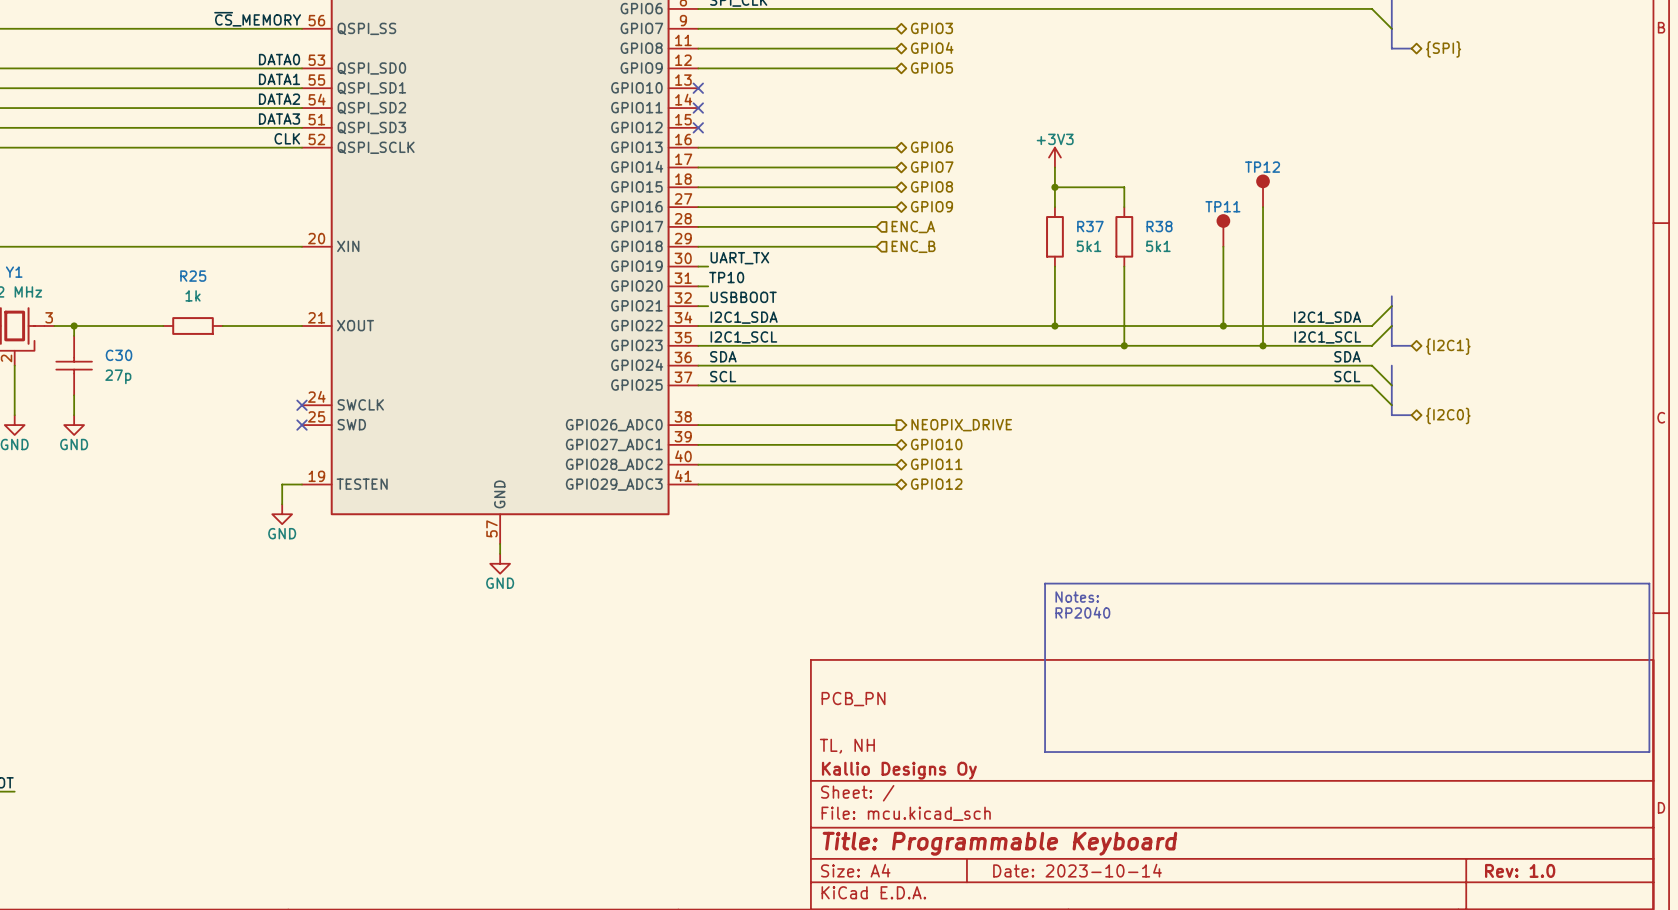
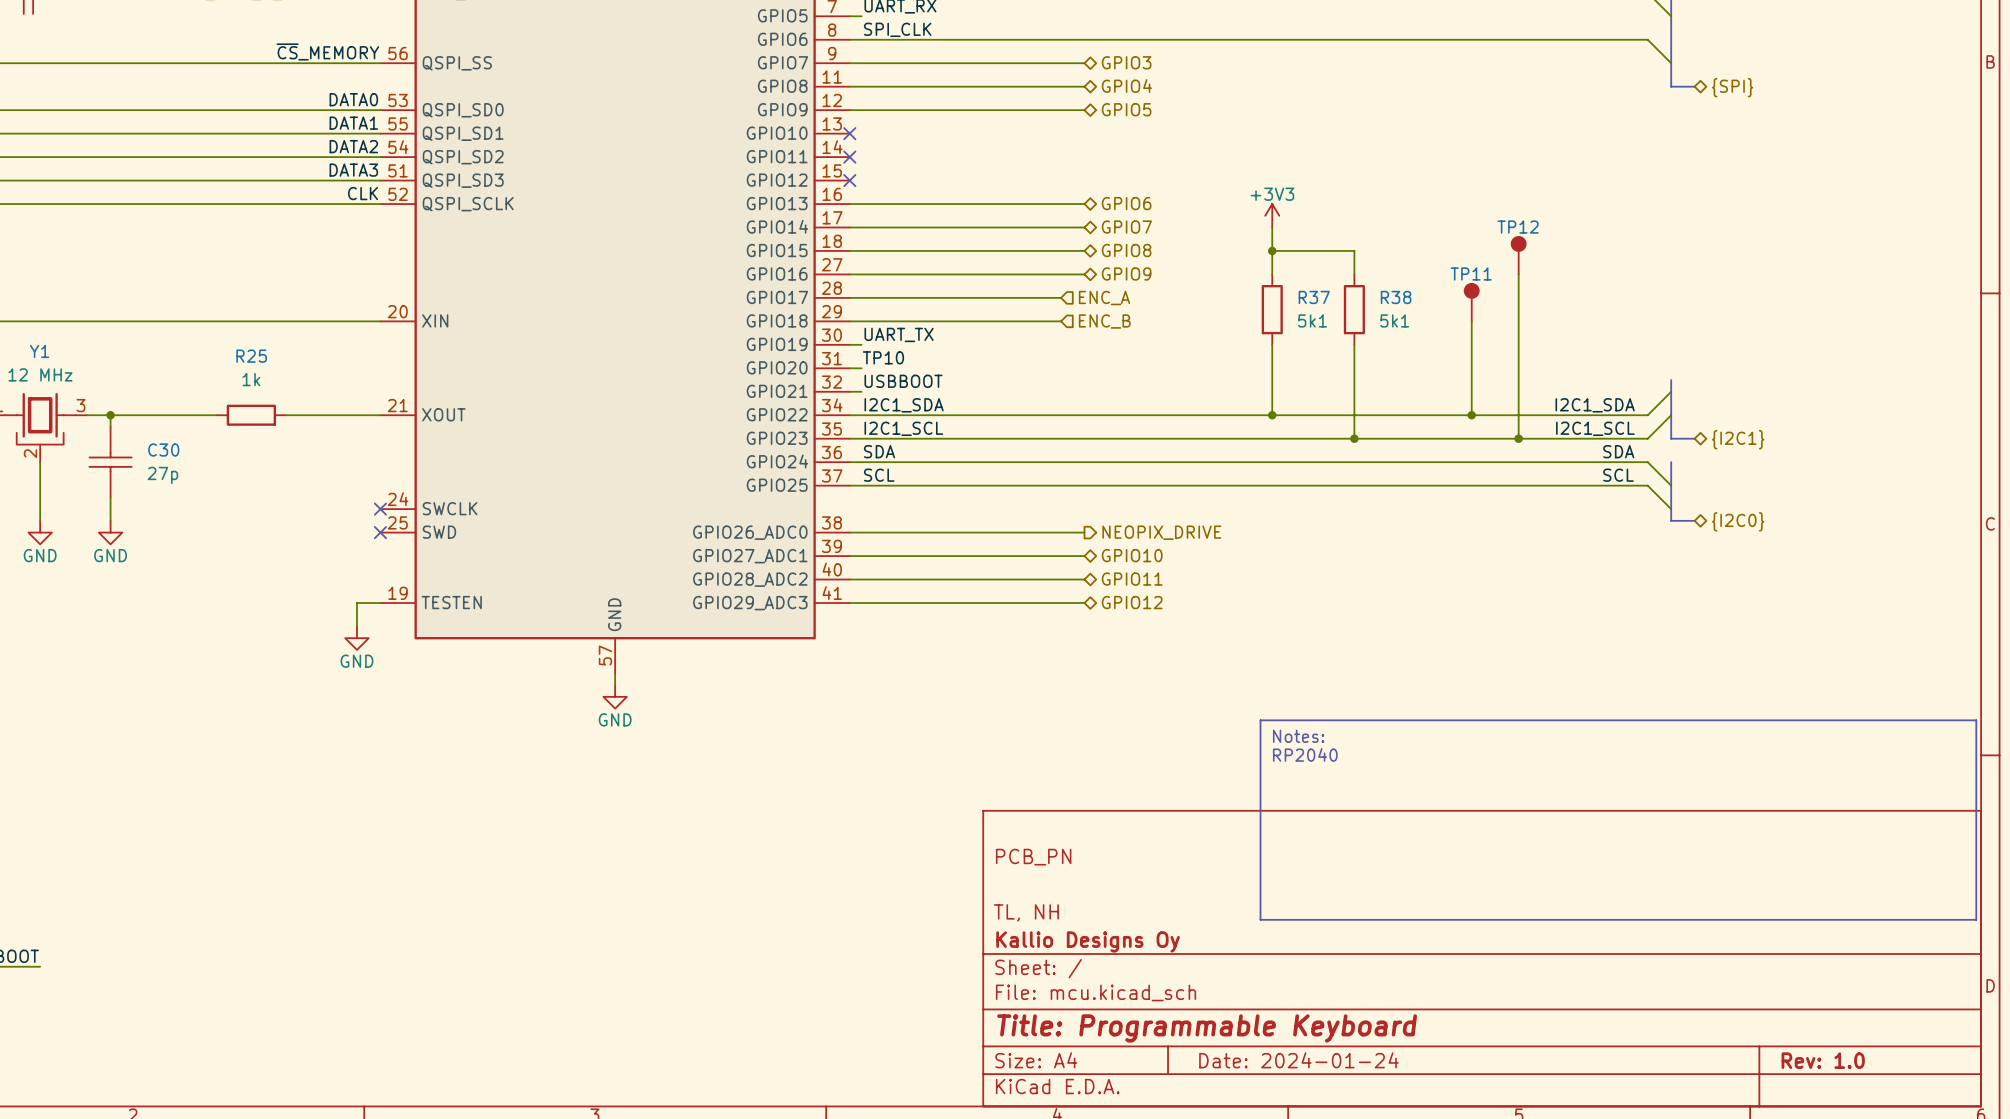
title block: Date: 2023-10-14 (1077, 870) -> Date: 2024-01-24 (1298, 1060)

